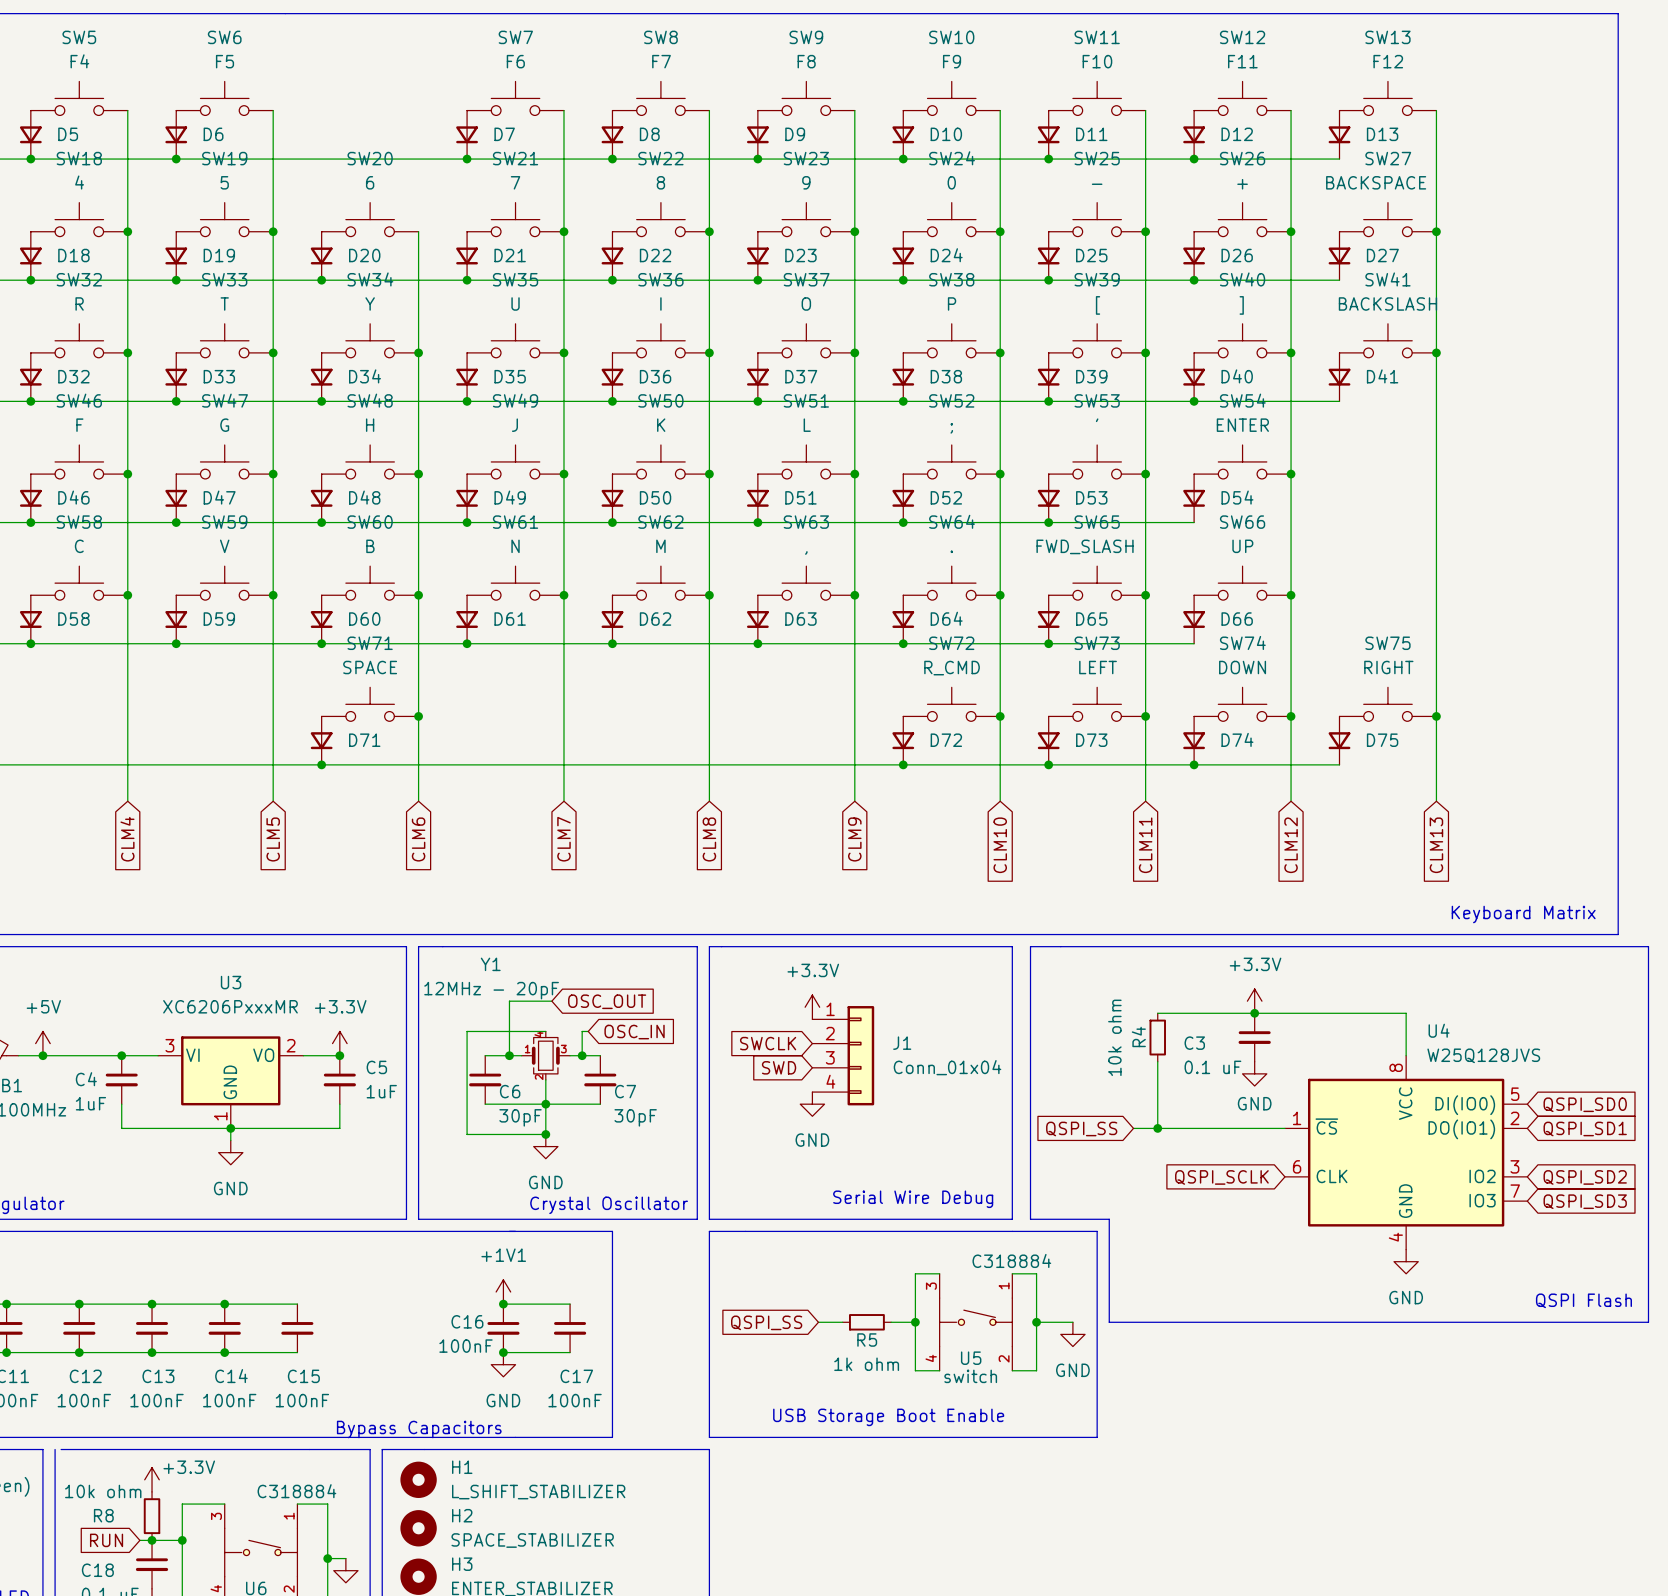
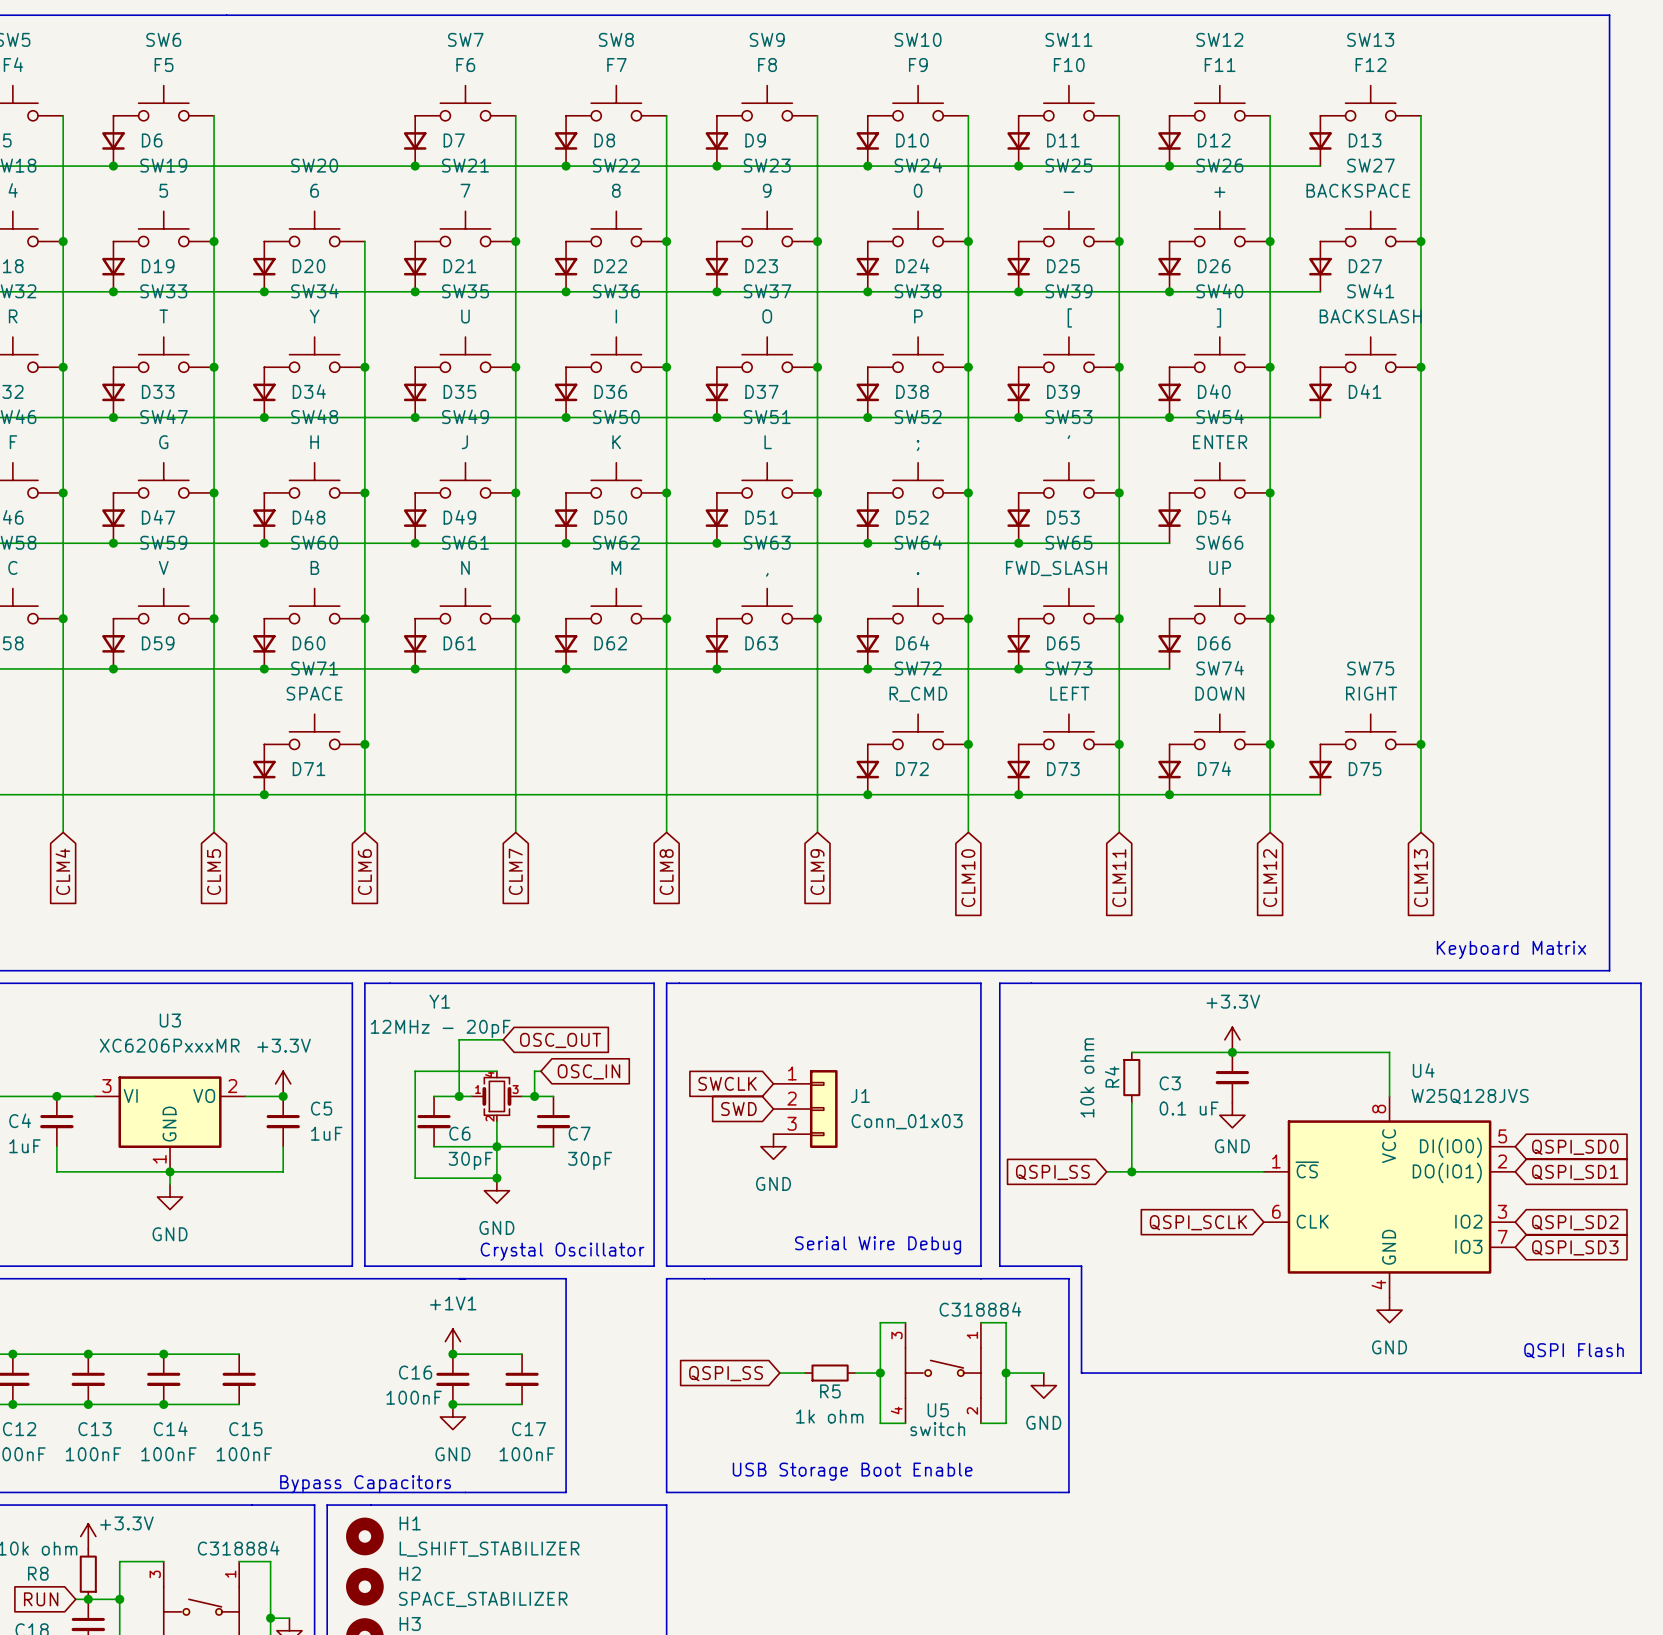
J1 symbol: [812, 1006, 875, 1106] -> [773, 1070, 838, 1148]
power symbol: +3.3V (812, 1007) -> none
J1 value: Conn_01x04 (947, 1067) -> Conn_01x03 (907, 1121)

